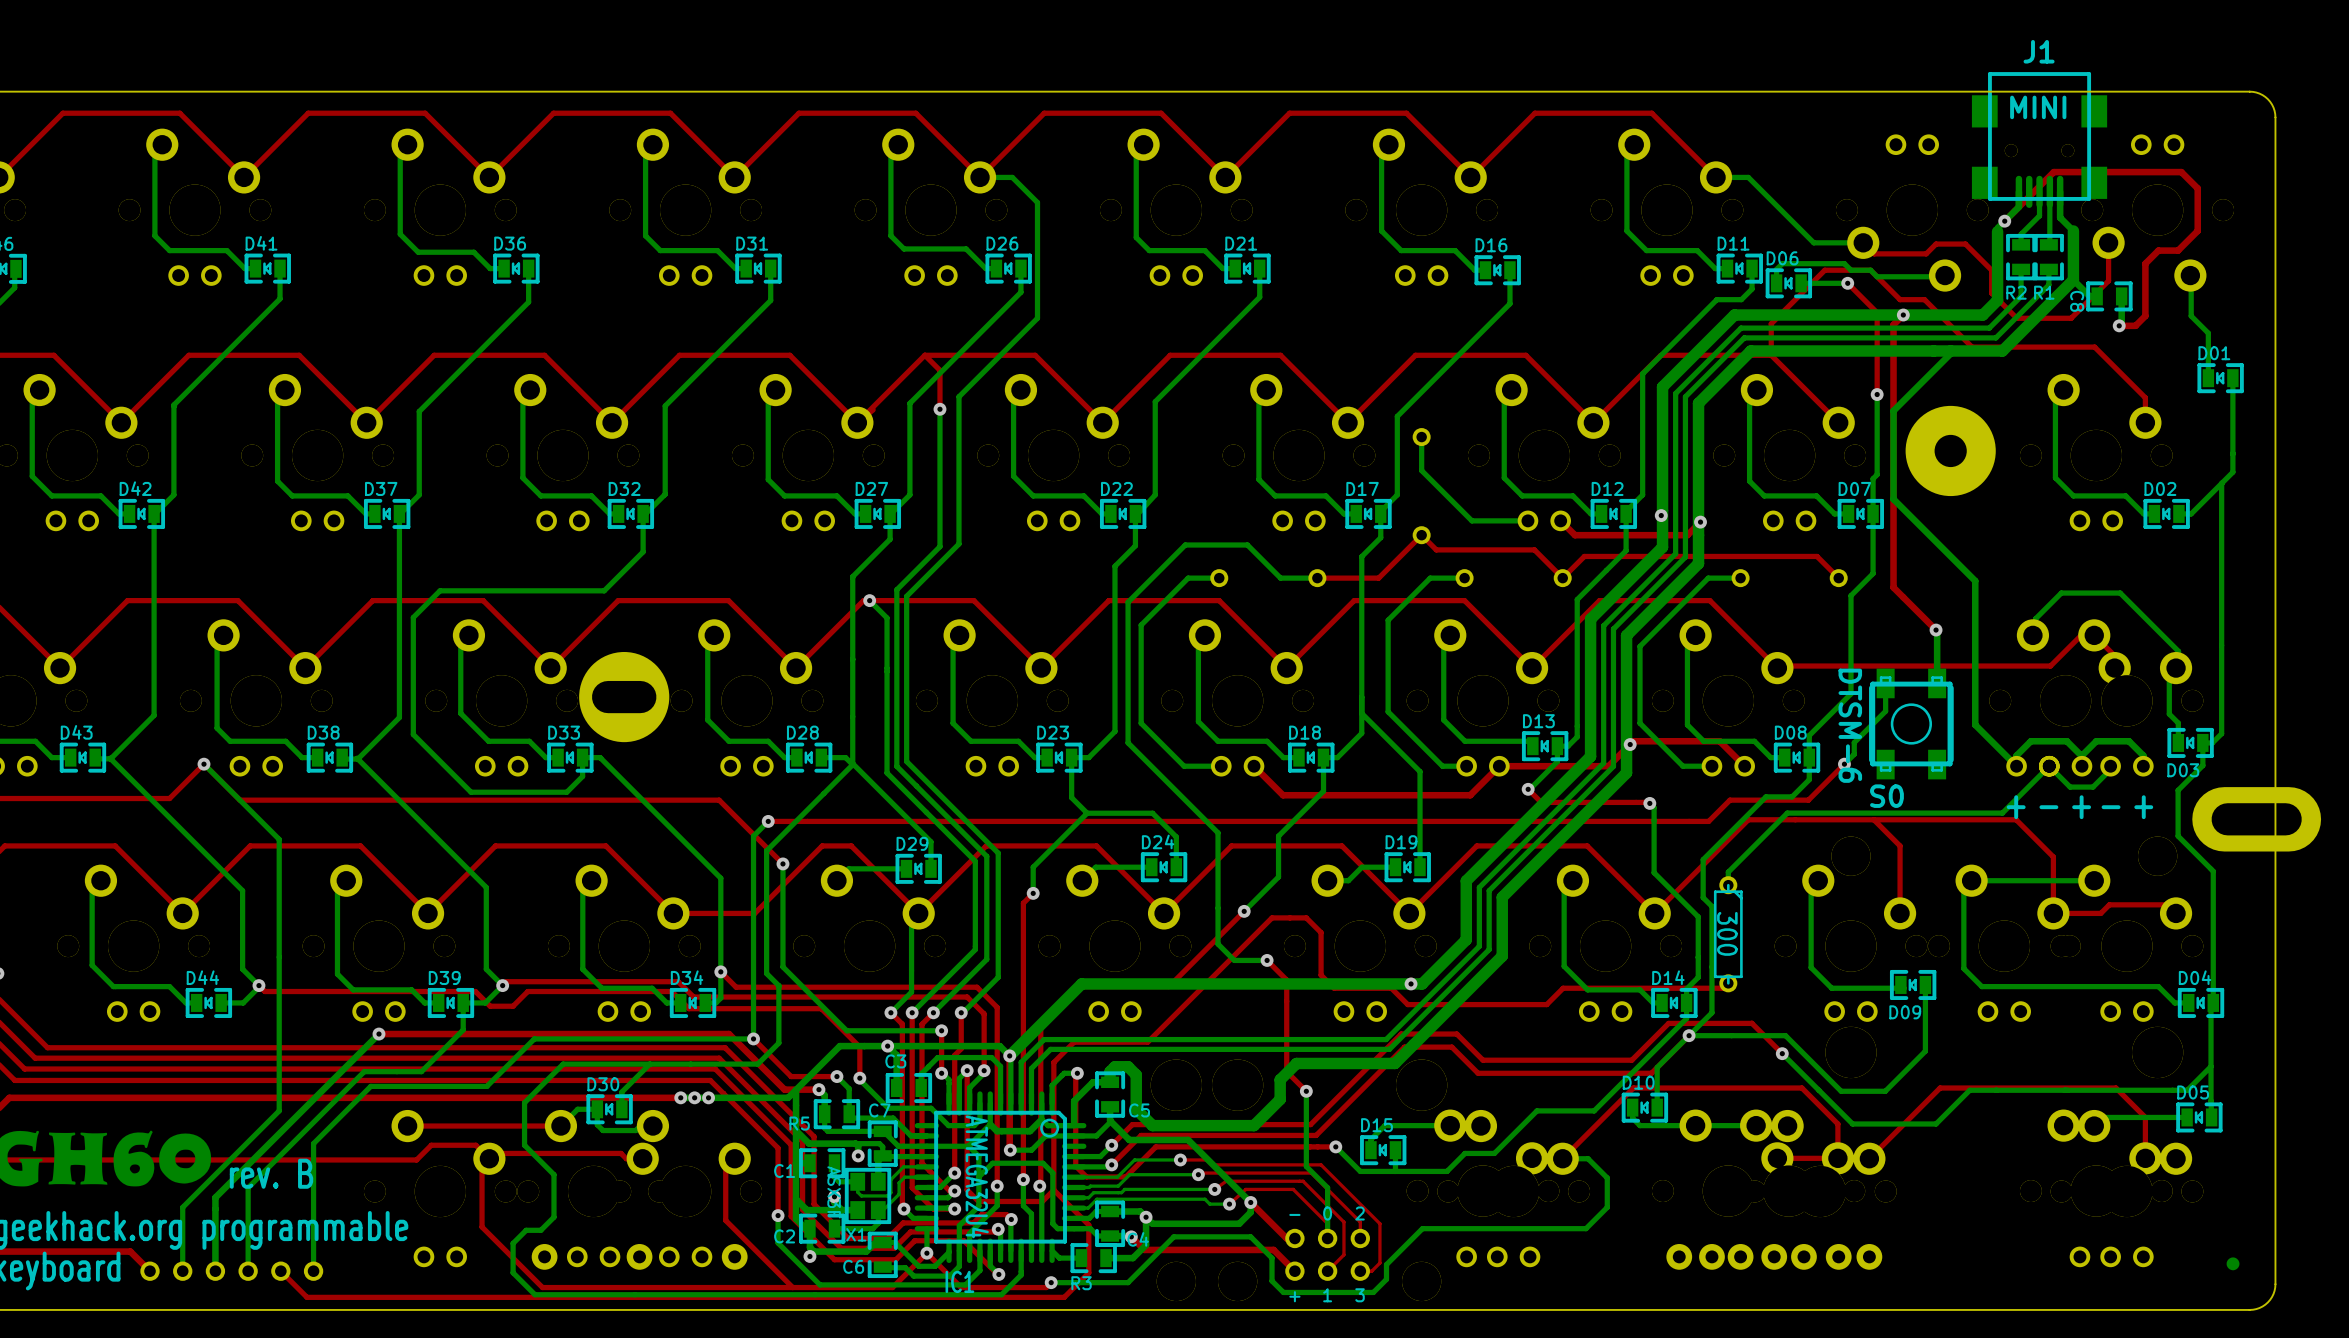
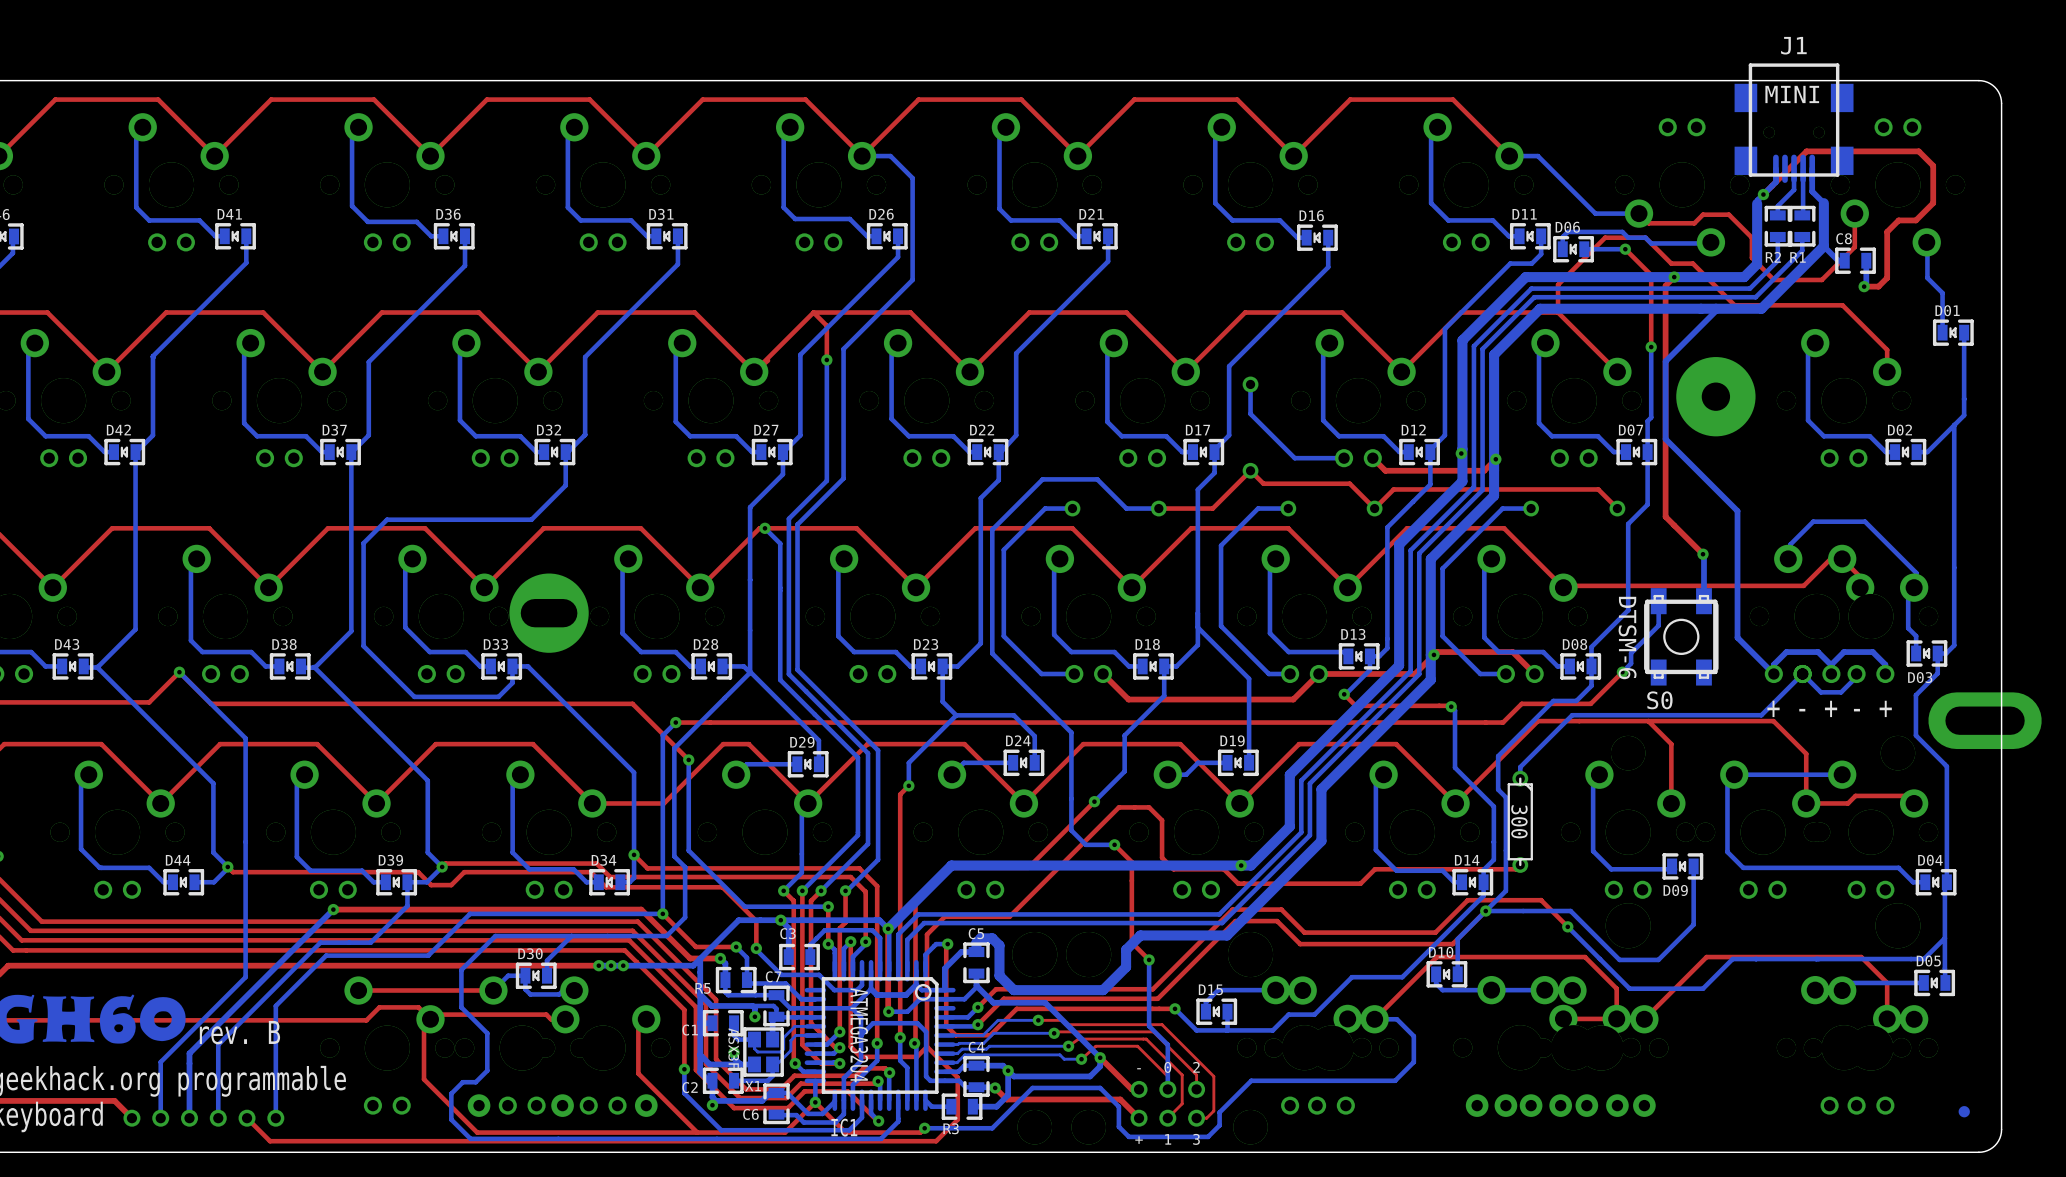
C8 name rotation: 0° (2077, 301) -> 90° counterclockwise (1844, 238)
C8 name position: C8 (2077, 301) -> C8 (1844, 238)
C5 name position: C5 (1139, 1110) -> C5 (976, 933)
C4 name position: C4 (1138, 1239) -> C4 (976, 1047)

